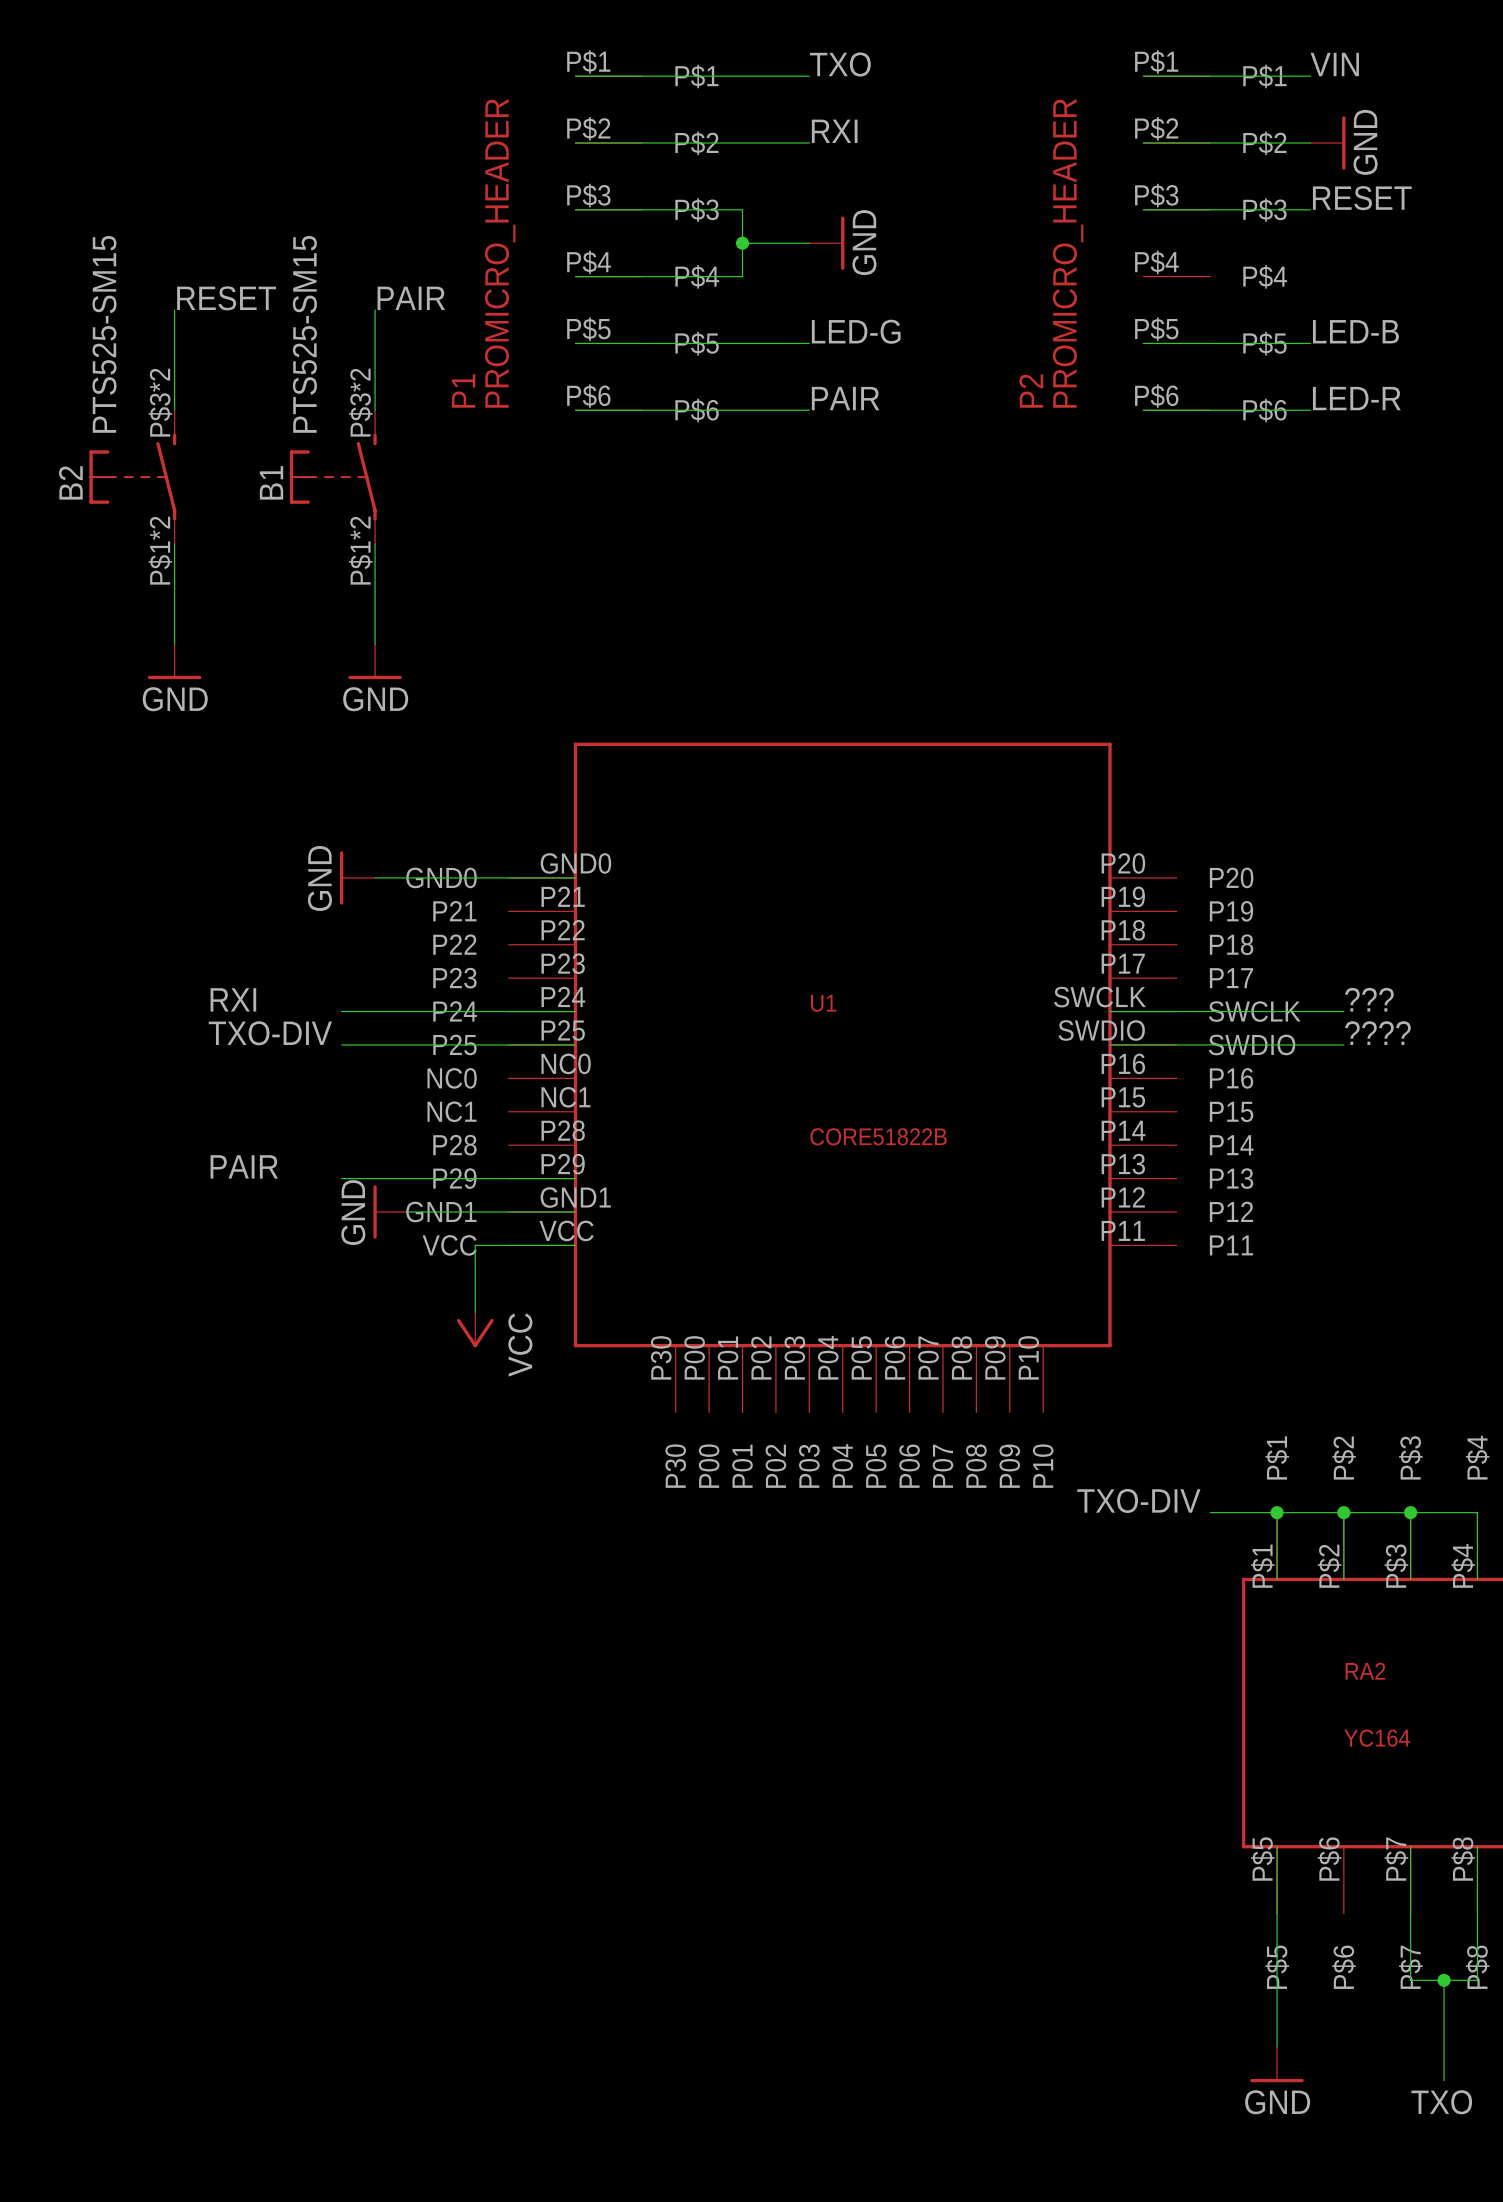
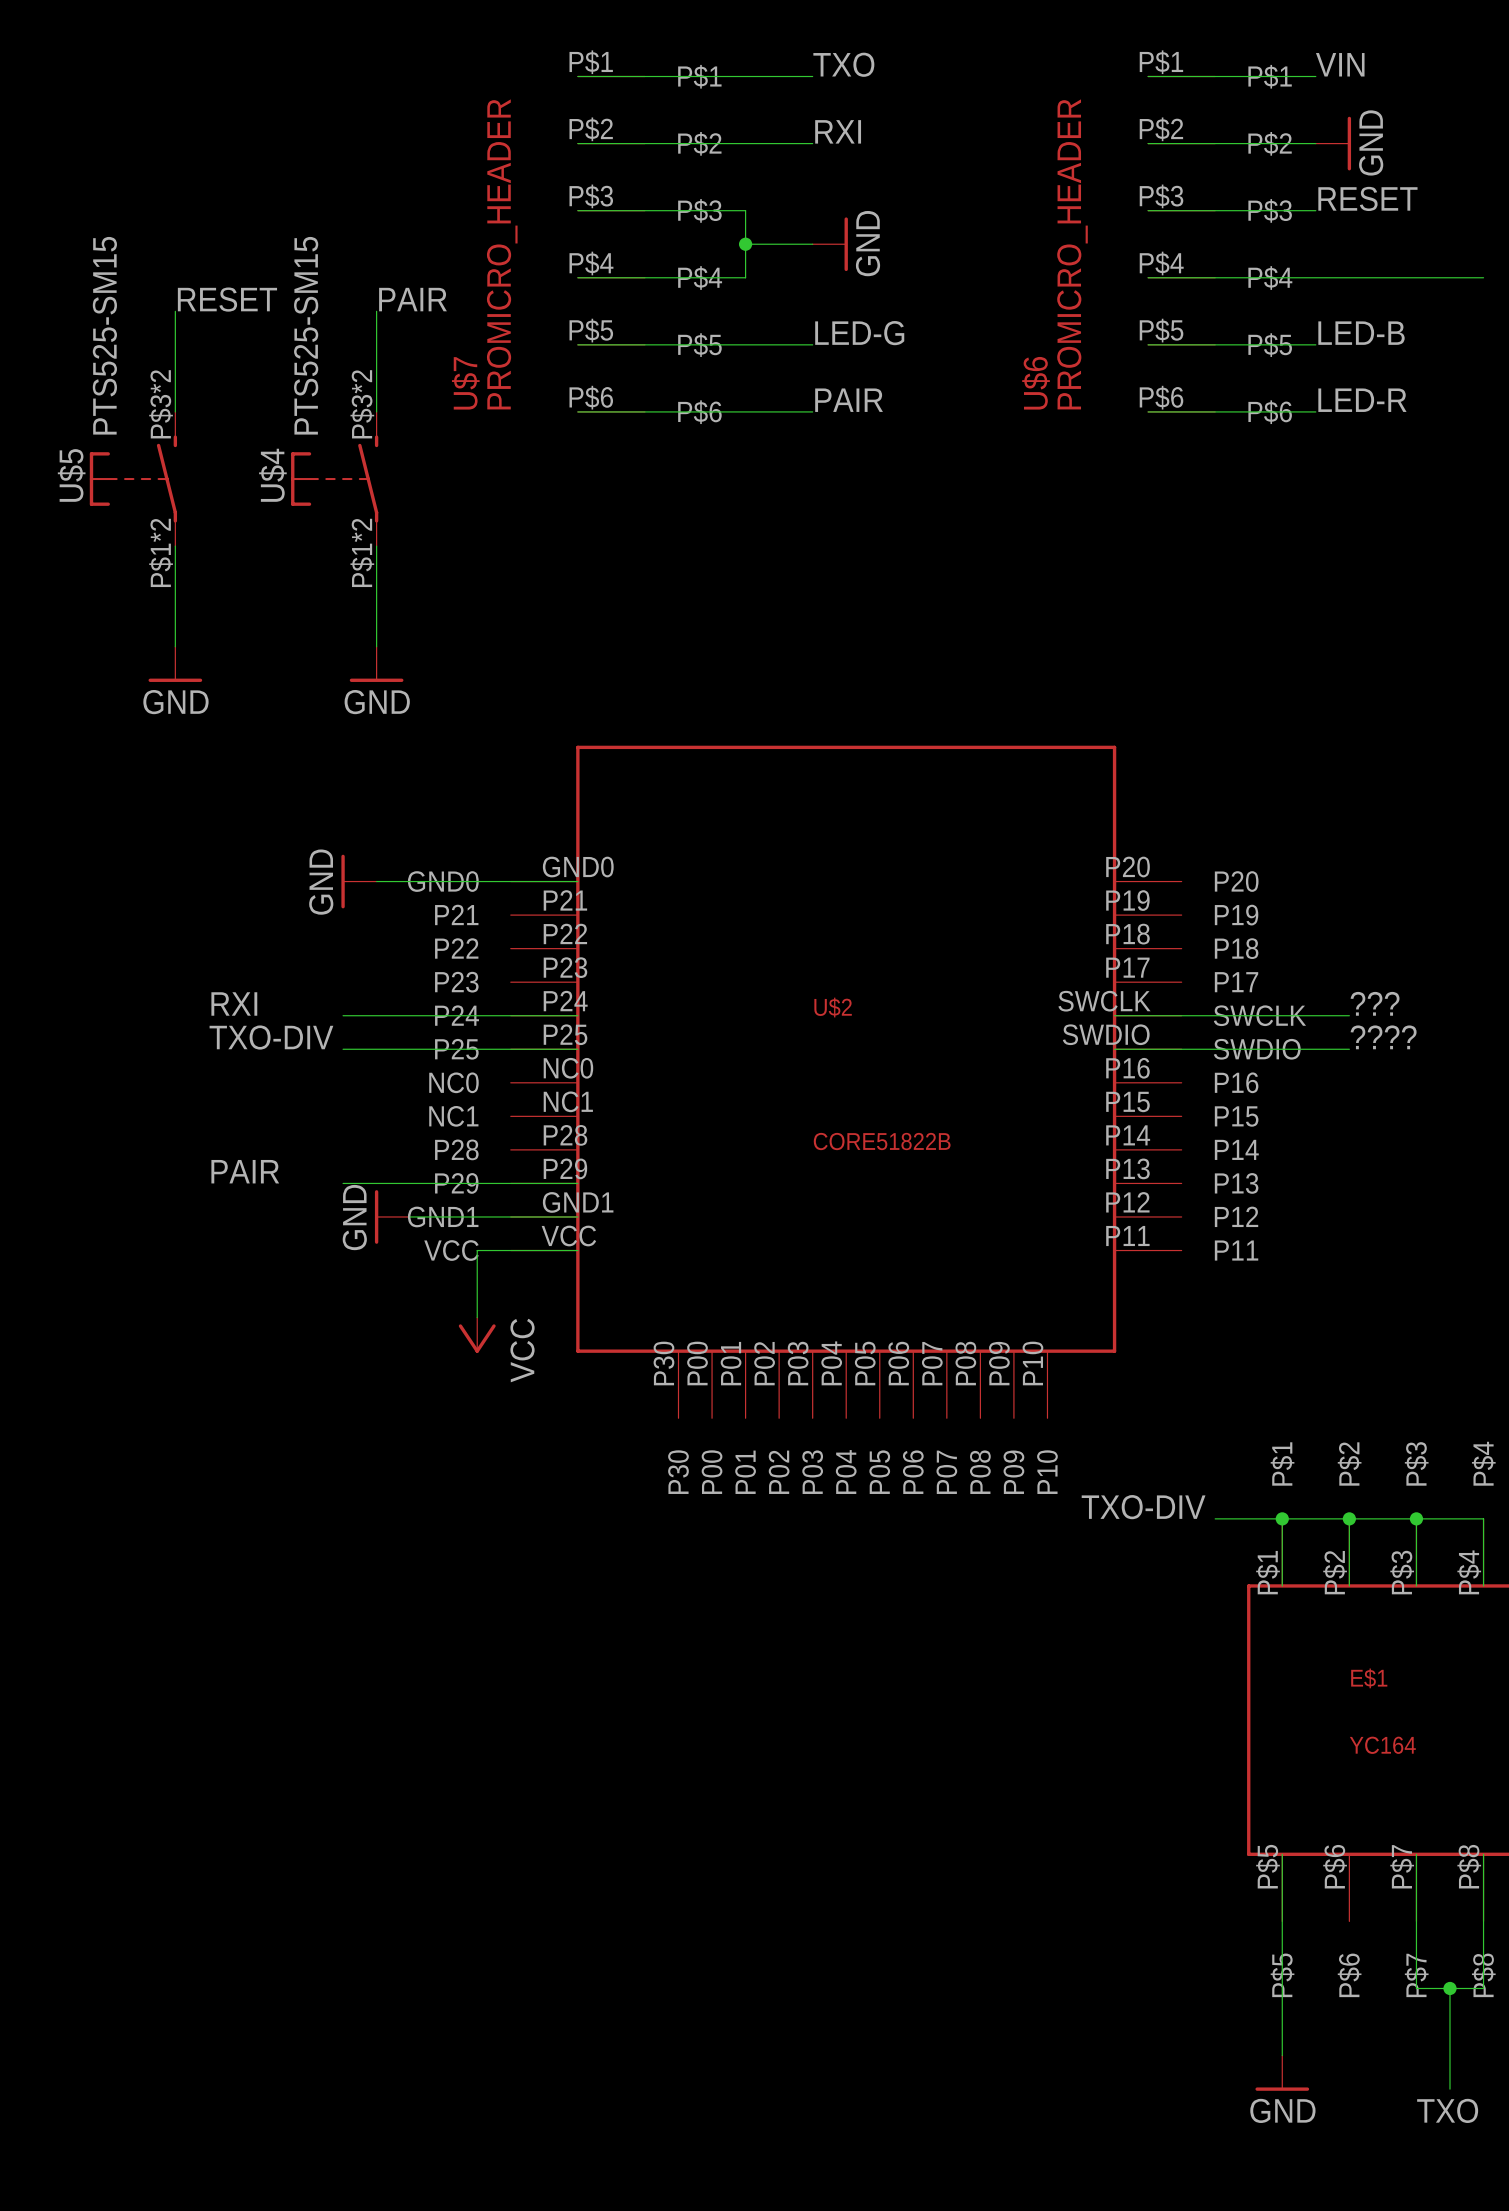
wire: none -> (1148, 277) (1483, 277)
P1 name: P1 (463, 391) -> U$7 (465, 383)
P2 name: P2 (1031, 391) -> U$6 (1036, 383)
B2 name: B2 (70, 482) -> U$5 (71, 475)
B1 name: B1 (271, 482) -> U$4 (272, 475)
U1 name: U1 (823, 1003) -> U$2 (833, 1007)
RA2 name: RA2 (1365, 1671) -> E$1 (1369, 1678)

